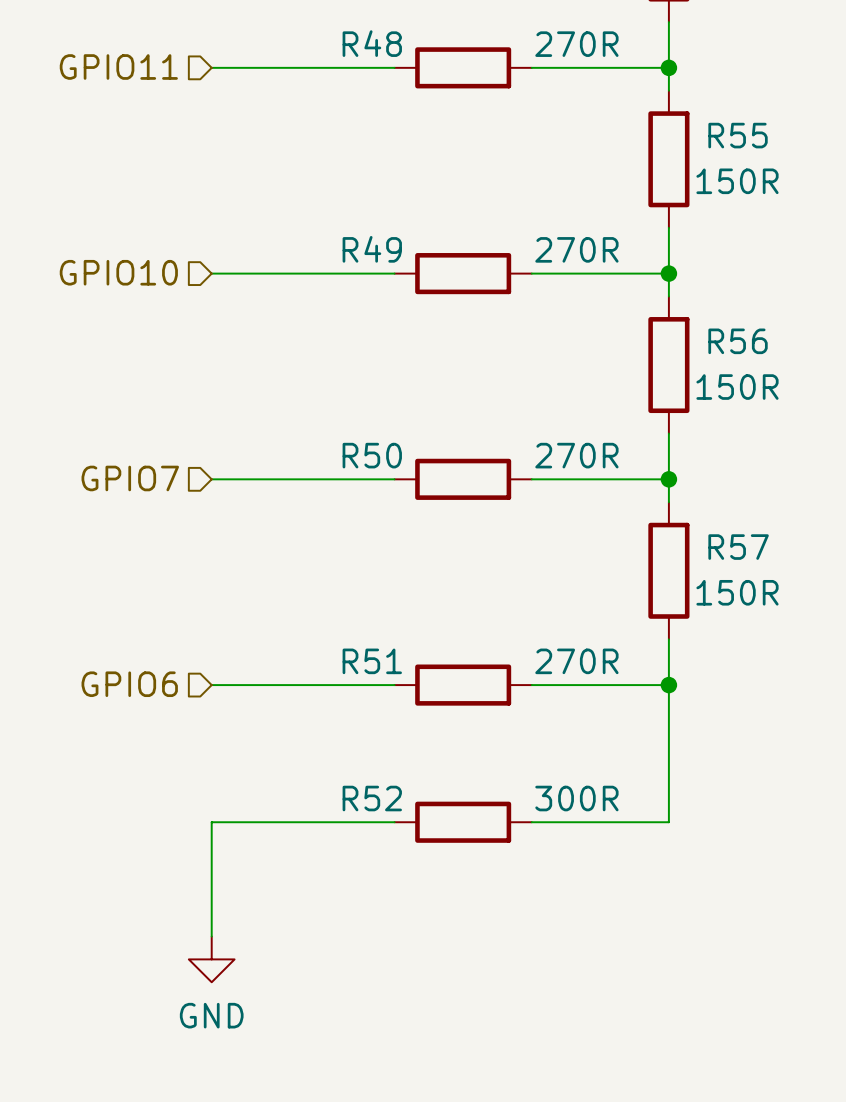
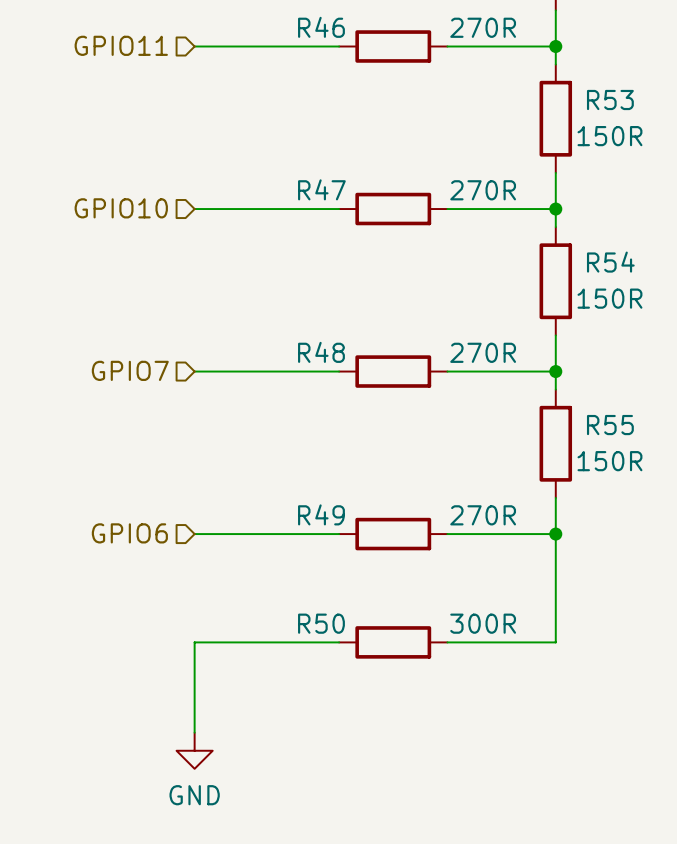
R48 name: R48 (372, 43) -> R46 (321, 27)
R55 name: R55 (738, 135) -> R53 (610, 100)
R49 name: R49 (372, 249) -> R47 (321, 189)
R56 name: R56 (738, 341) -> R54 (610, 262)
R50 name: R50 (372, 455) -> R48 (321, 352)
R57 name: R57 (738, 547) -> R55 (610, 425)
R51 name: R51 (372, 661) -> R49 (321, 514)
R52 name: R52 (372, 798) -> R50 (321, 623)

